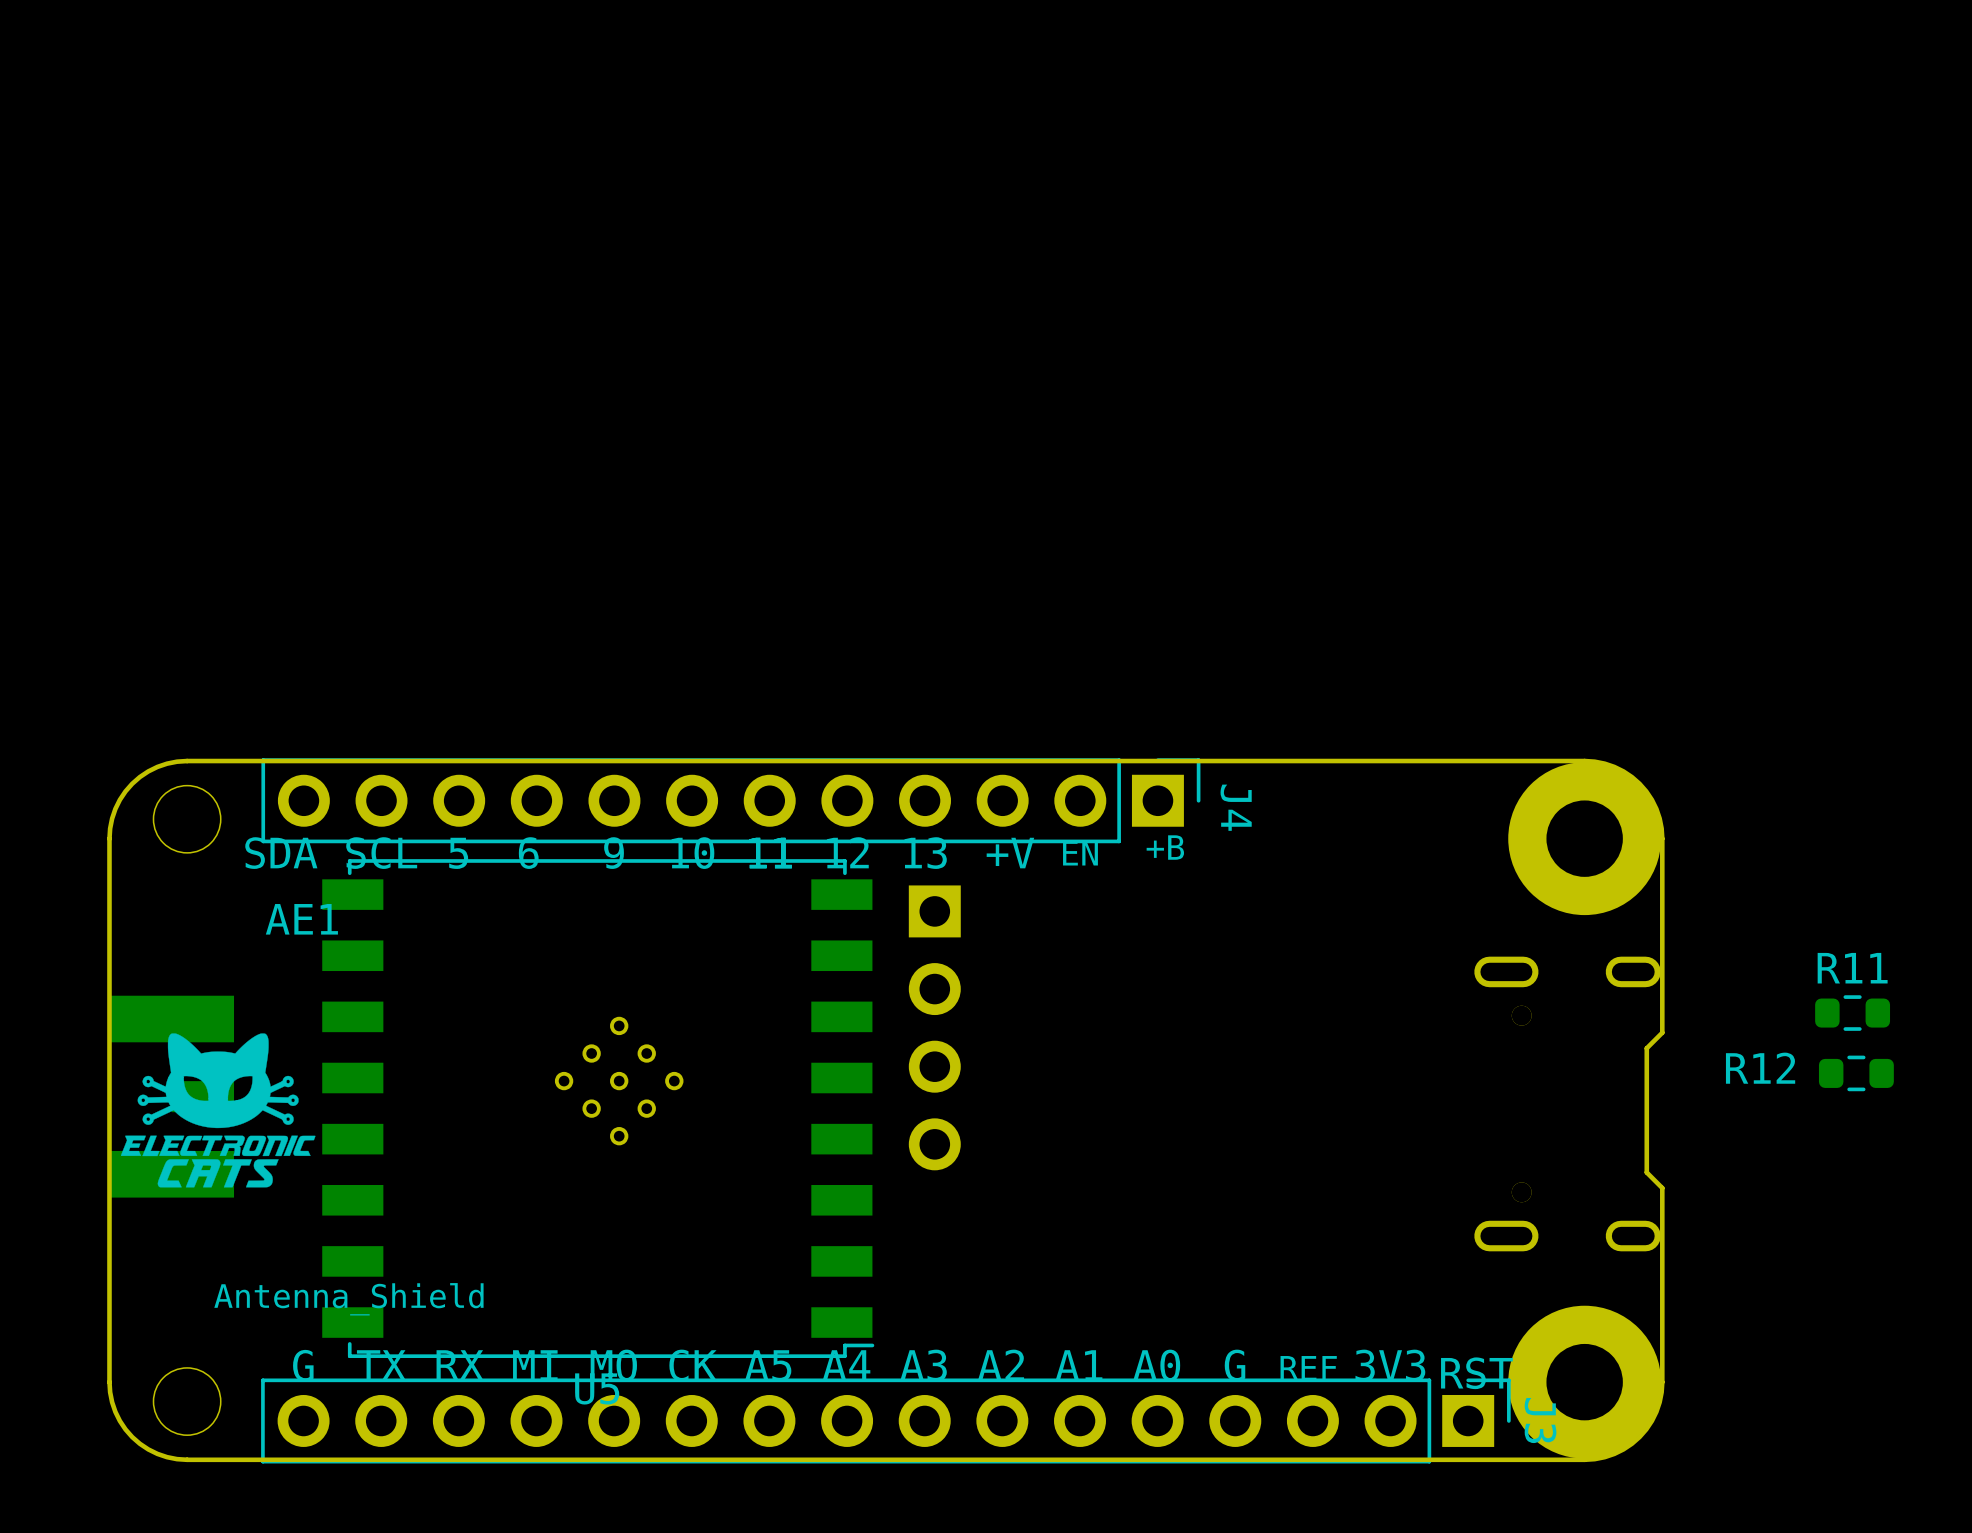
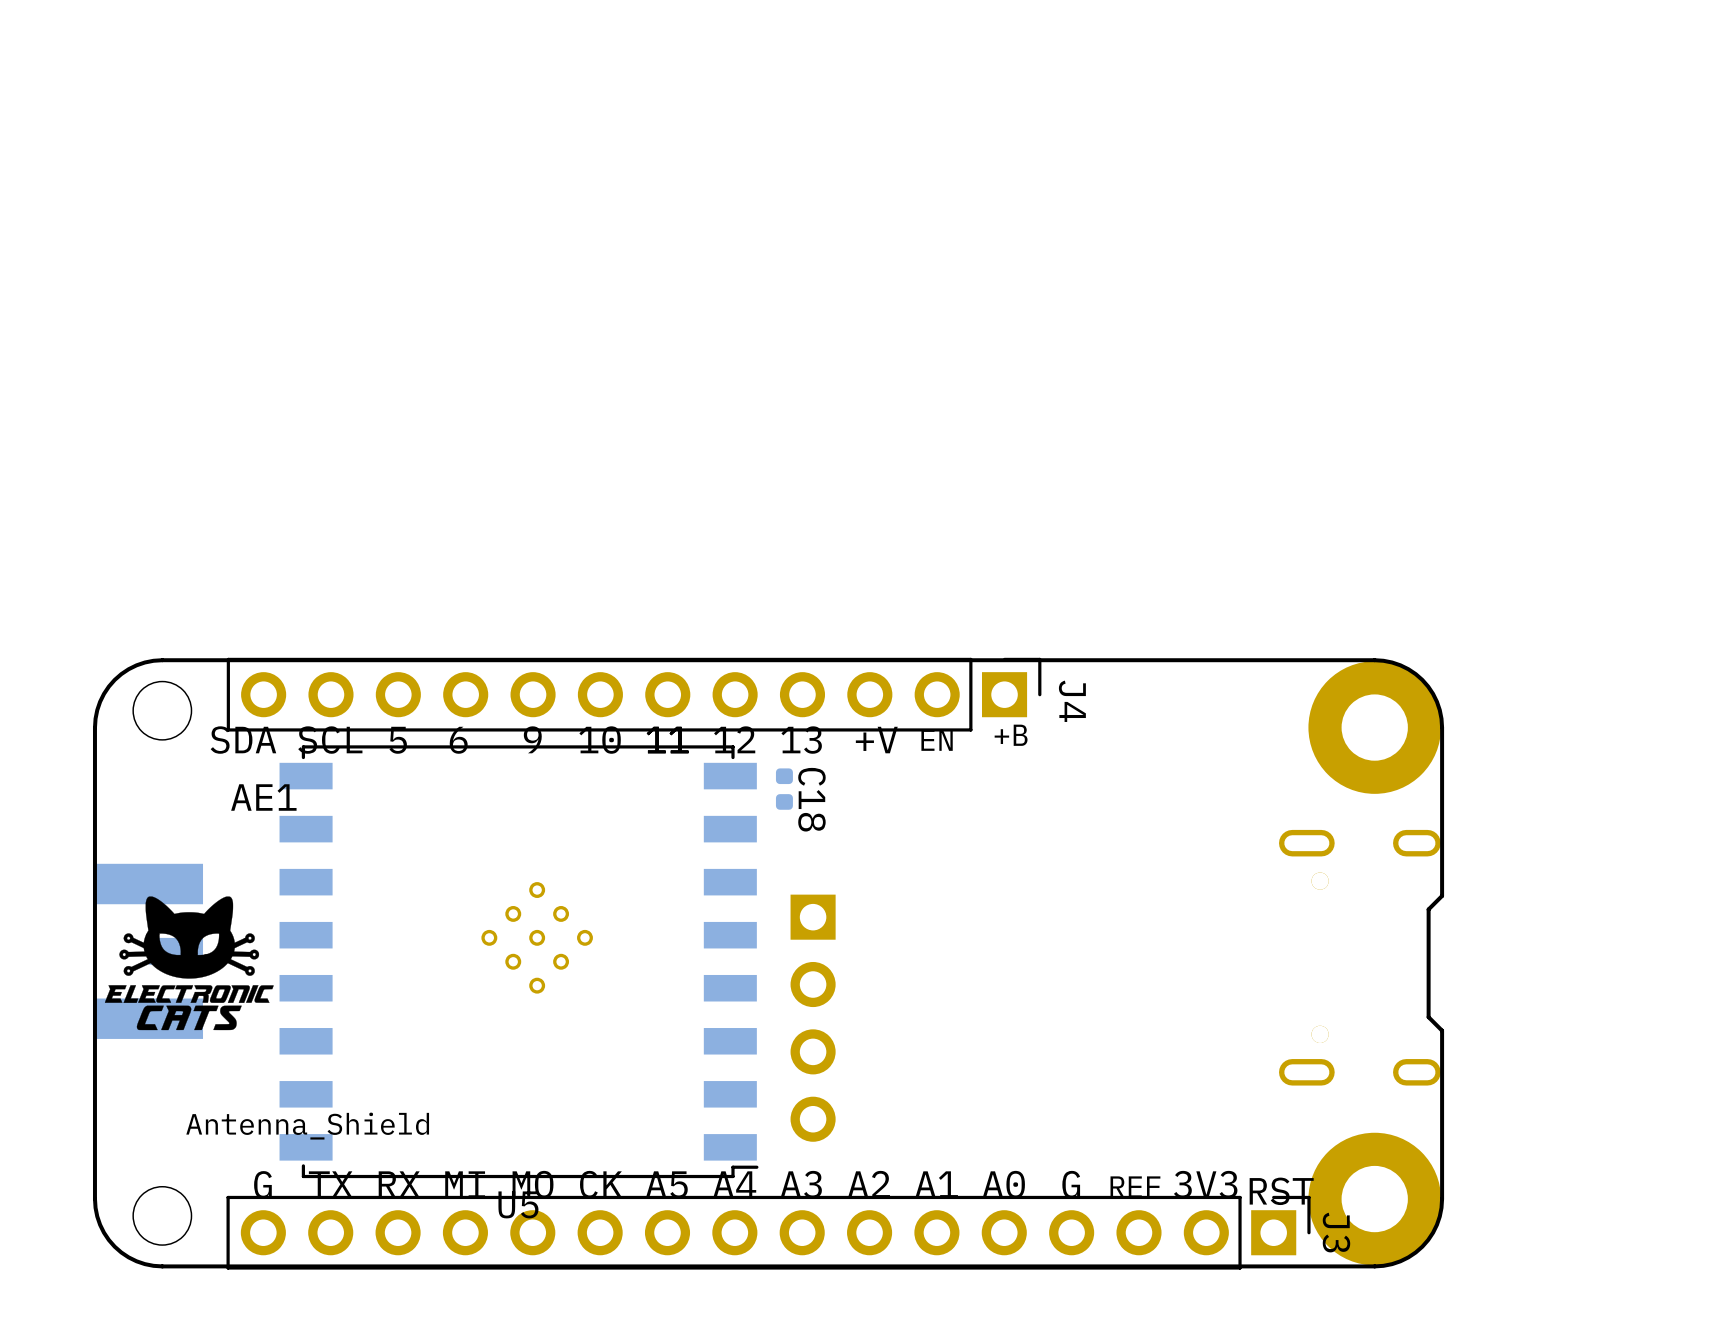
C18: none -> (784, 789)
R11: (1852, 1013) -> none
part position: (934, 1027) -> (813, 1018)
R12: (1856, 1073) -> none

